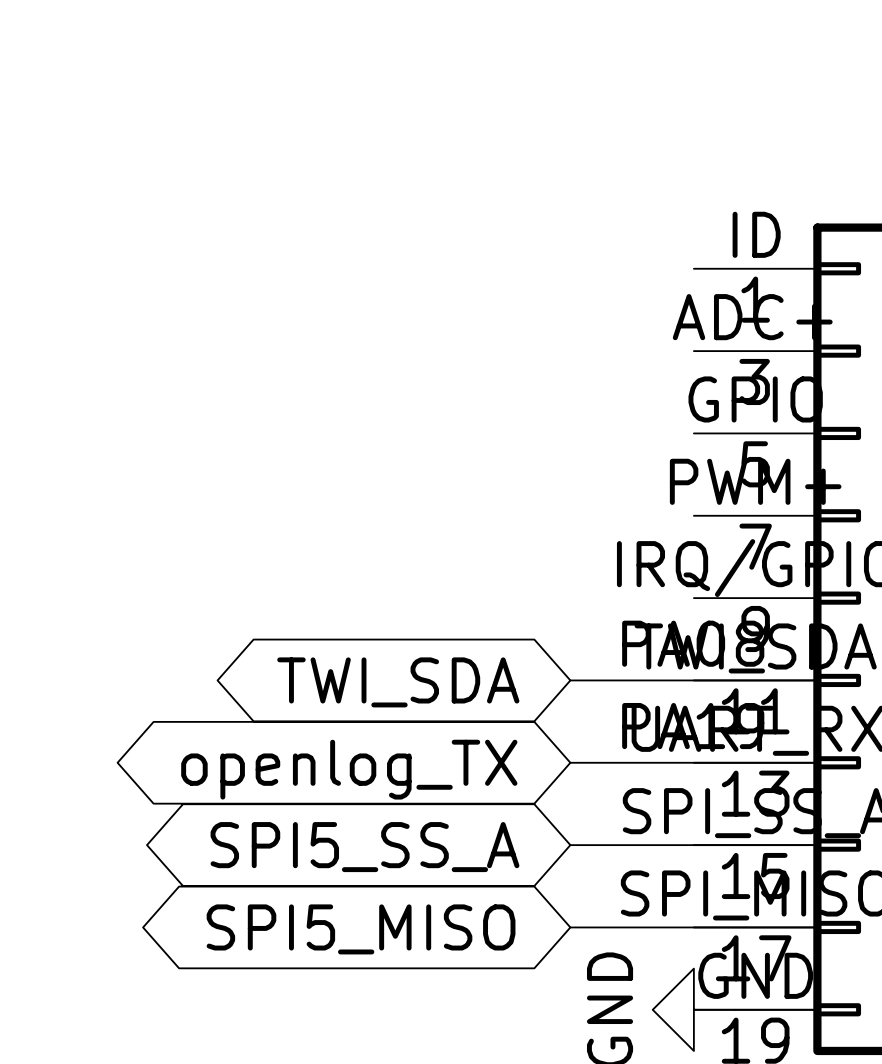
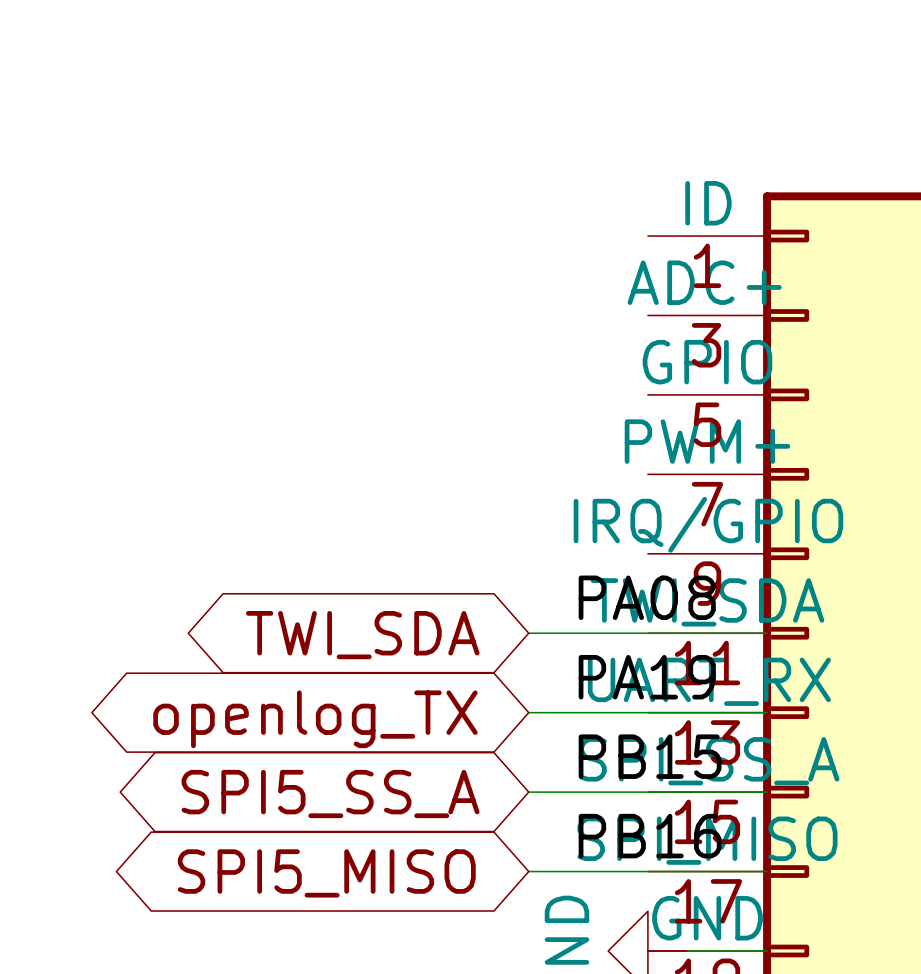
label: none -> PB15 (650, 756)
label: none -> PB16 (650, 836)

